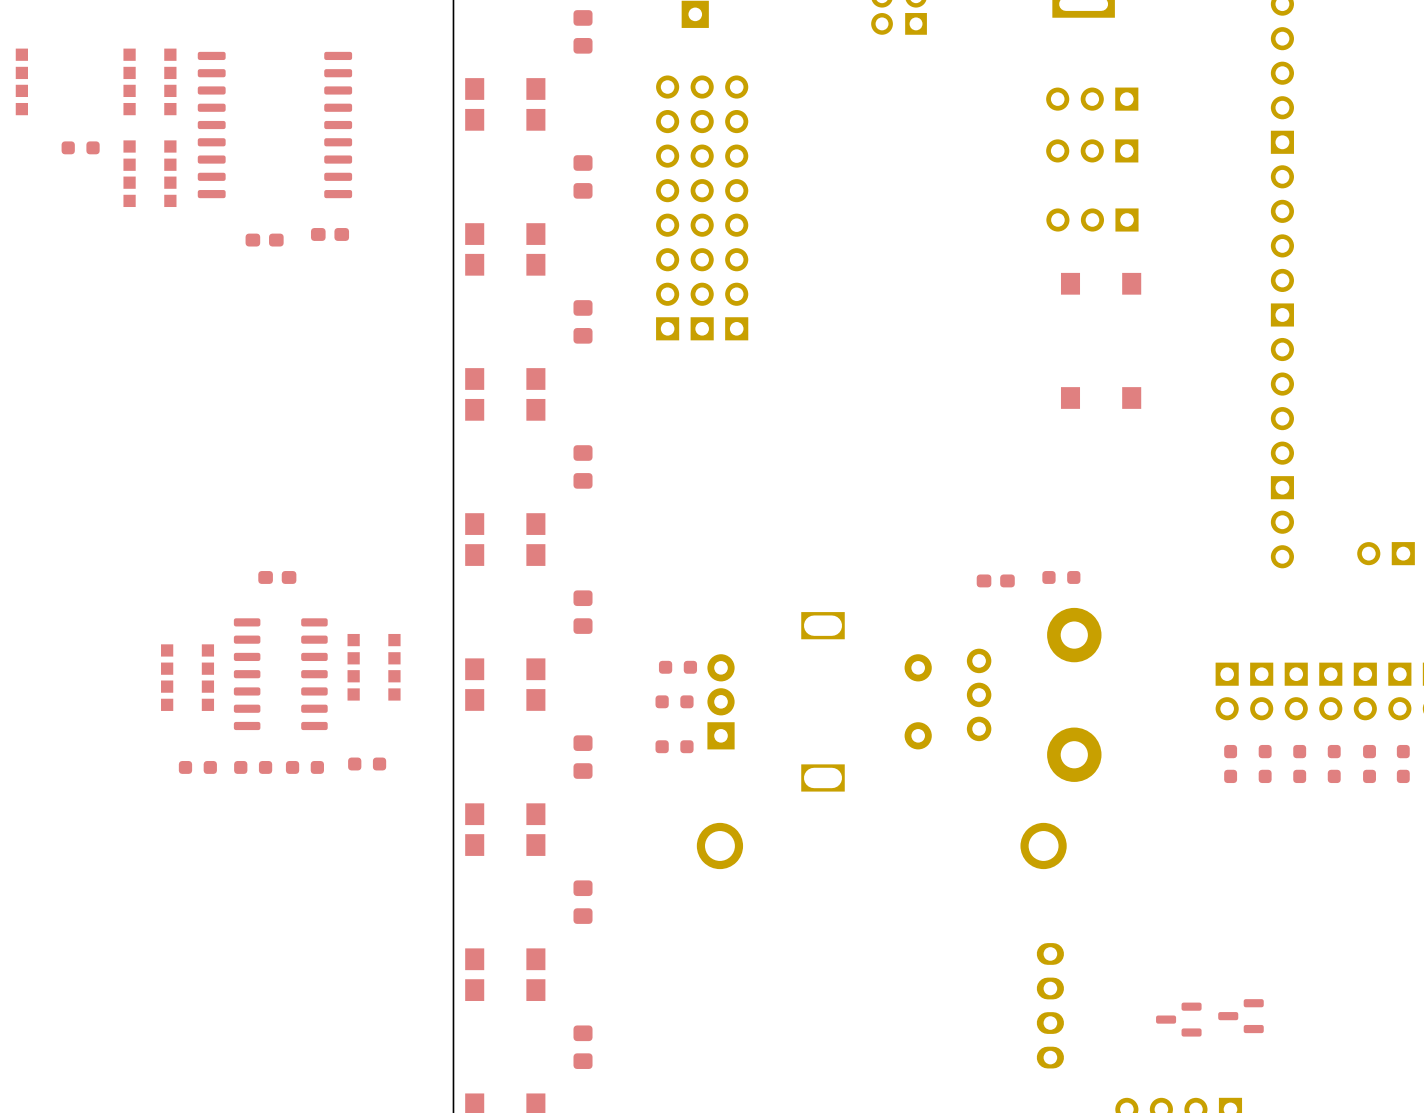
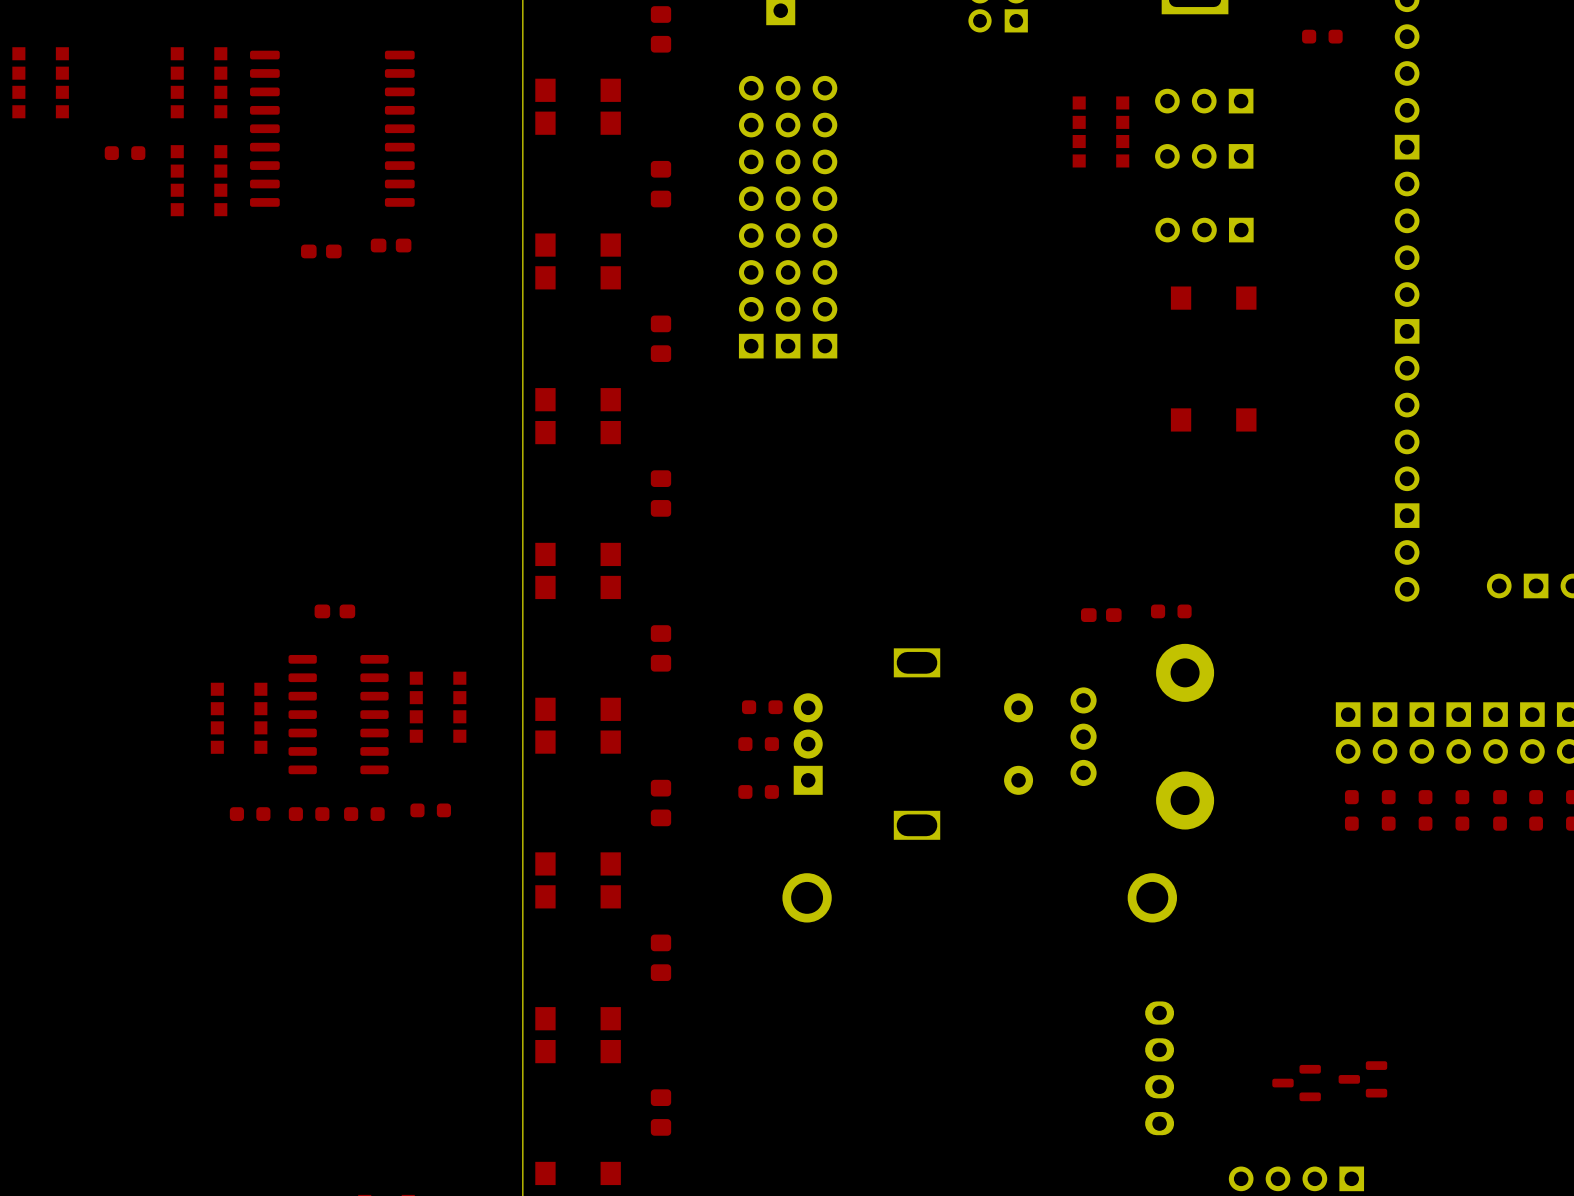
part: none -> (1322, 36)
part: none -> (1100, 131)

